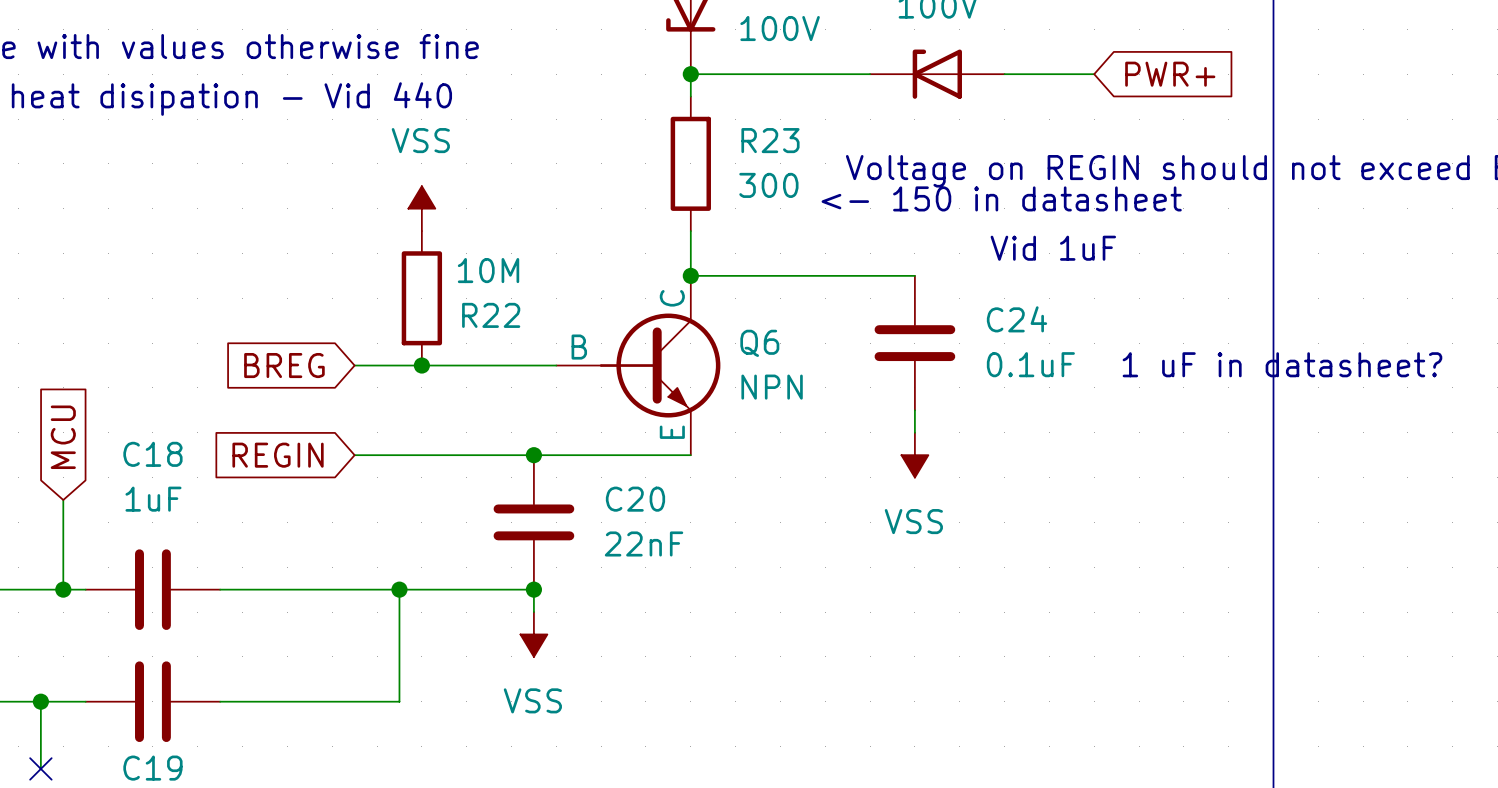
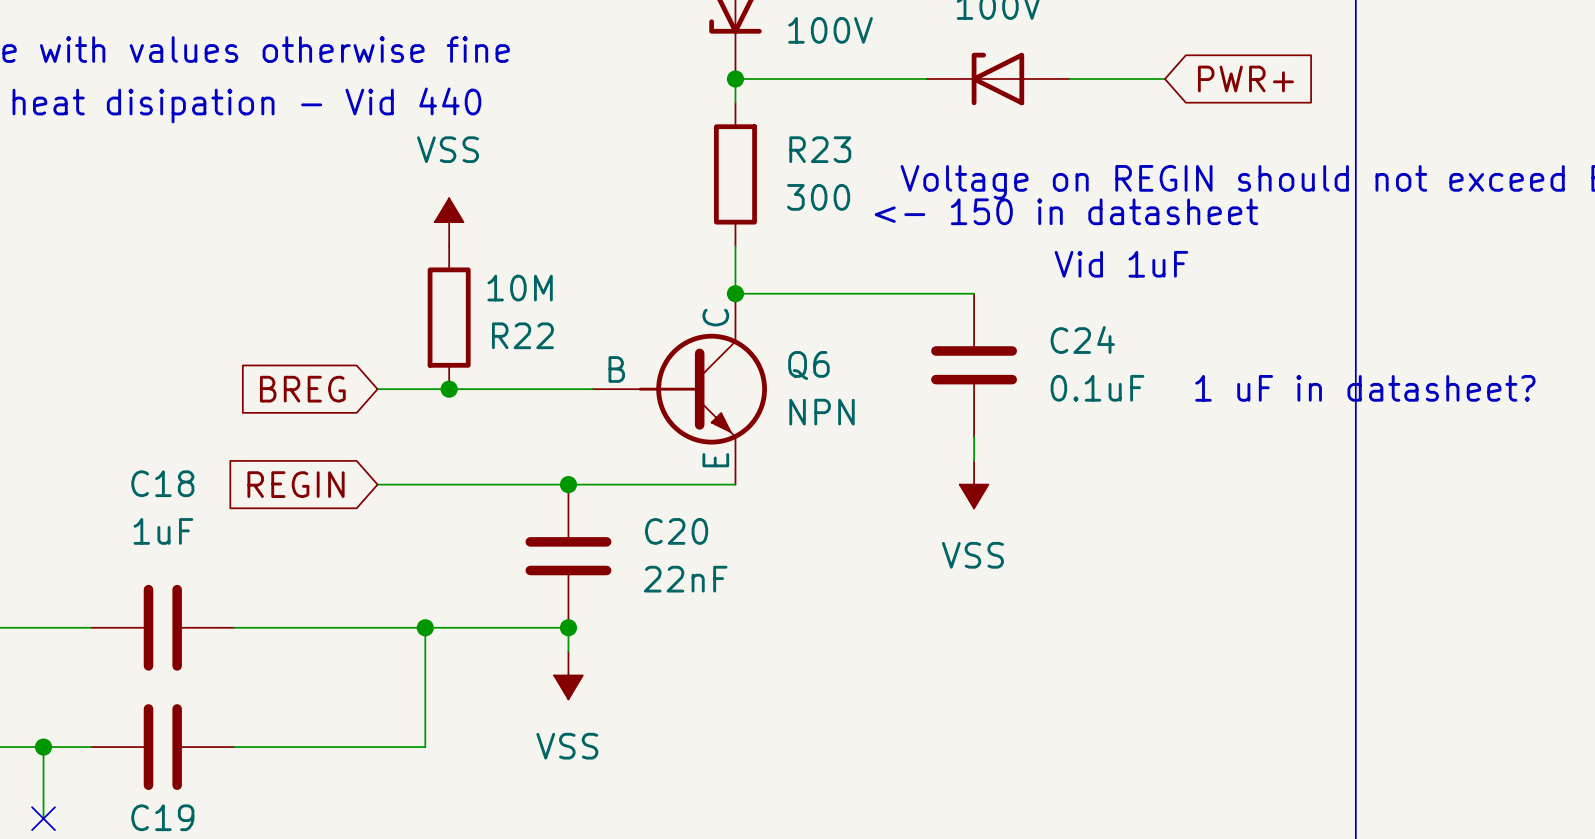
global label: MCU (63, 437) -> none
wire: (63, 499) (63, 589) -> none
junction: (63, 589) -> none

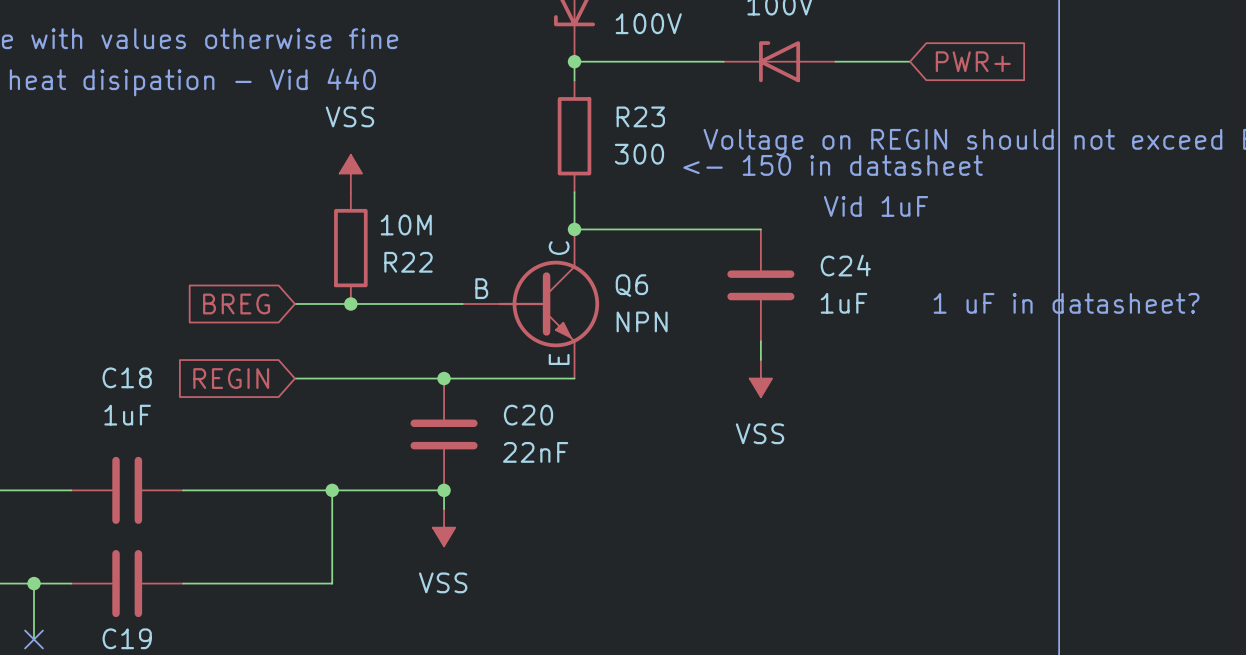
C24 value: 0.1uF (1097, 388) -> 1uF (844, 303)

